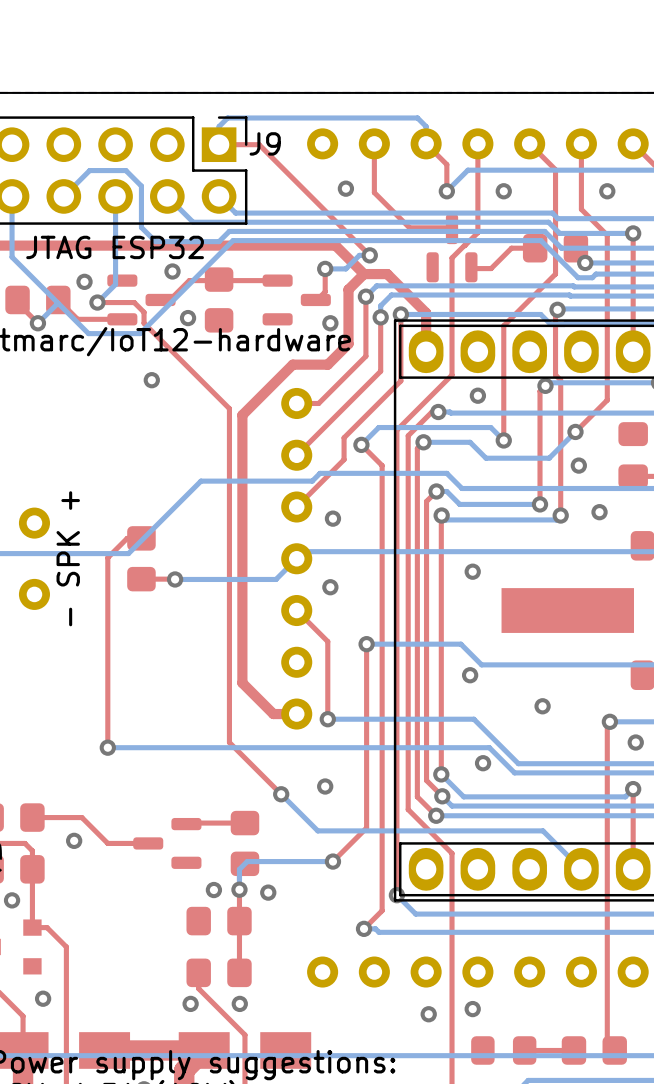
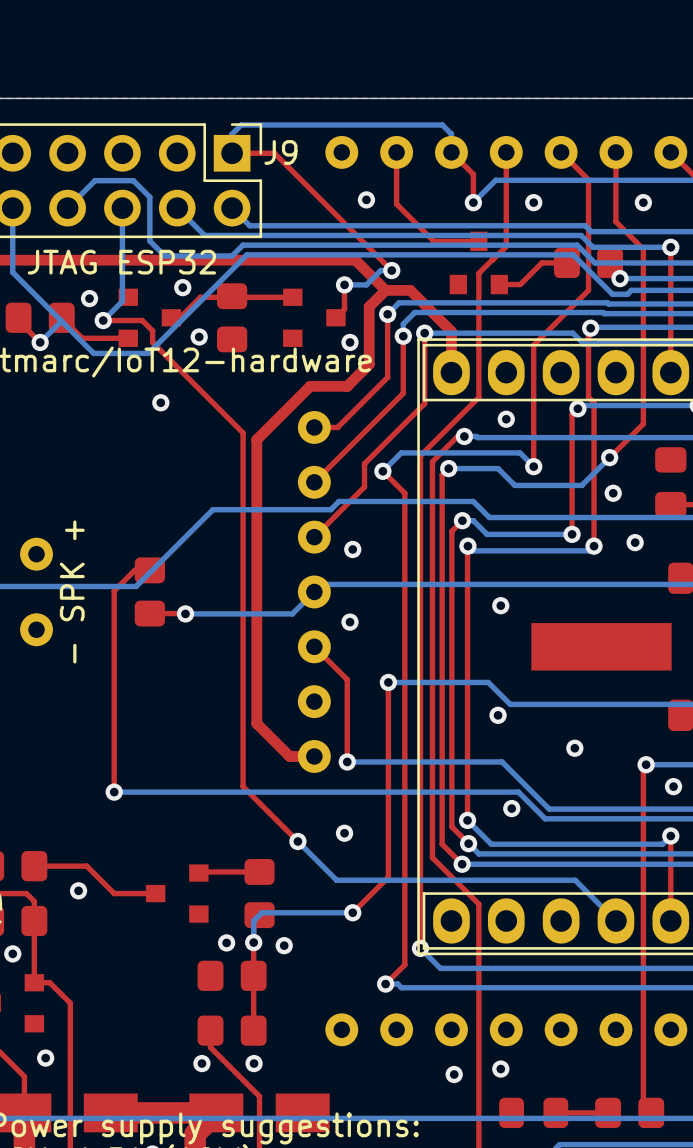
part footprint: [426, 214, 478, 283] -> [449, 231, 509, 295]
part footprint: [107, 274, 176, 326] -> [118, 288, 182, 347]
part footprint: [262, 274, 331, 326] -> [283, 288, 346, 347]
part footprint: [133, 817, 202, 869] -> [145, 864, 209, 923]

